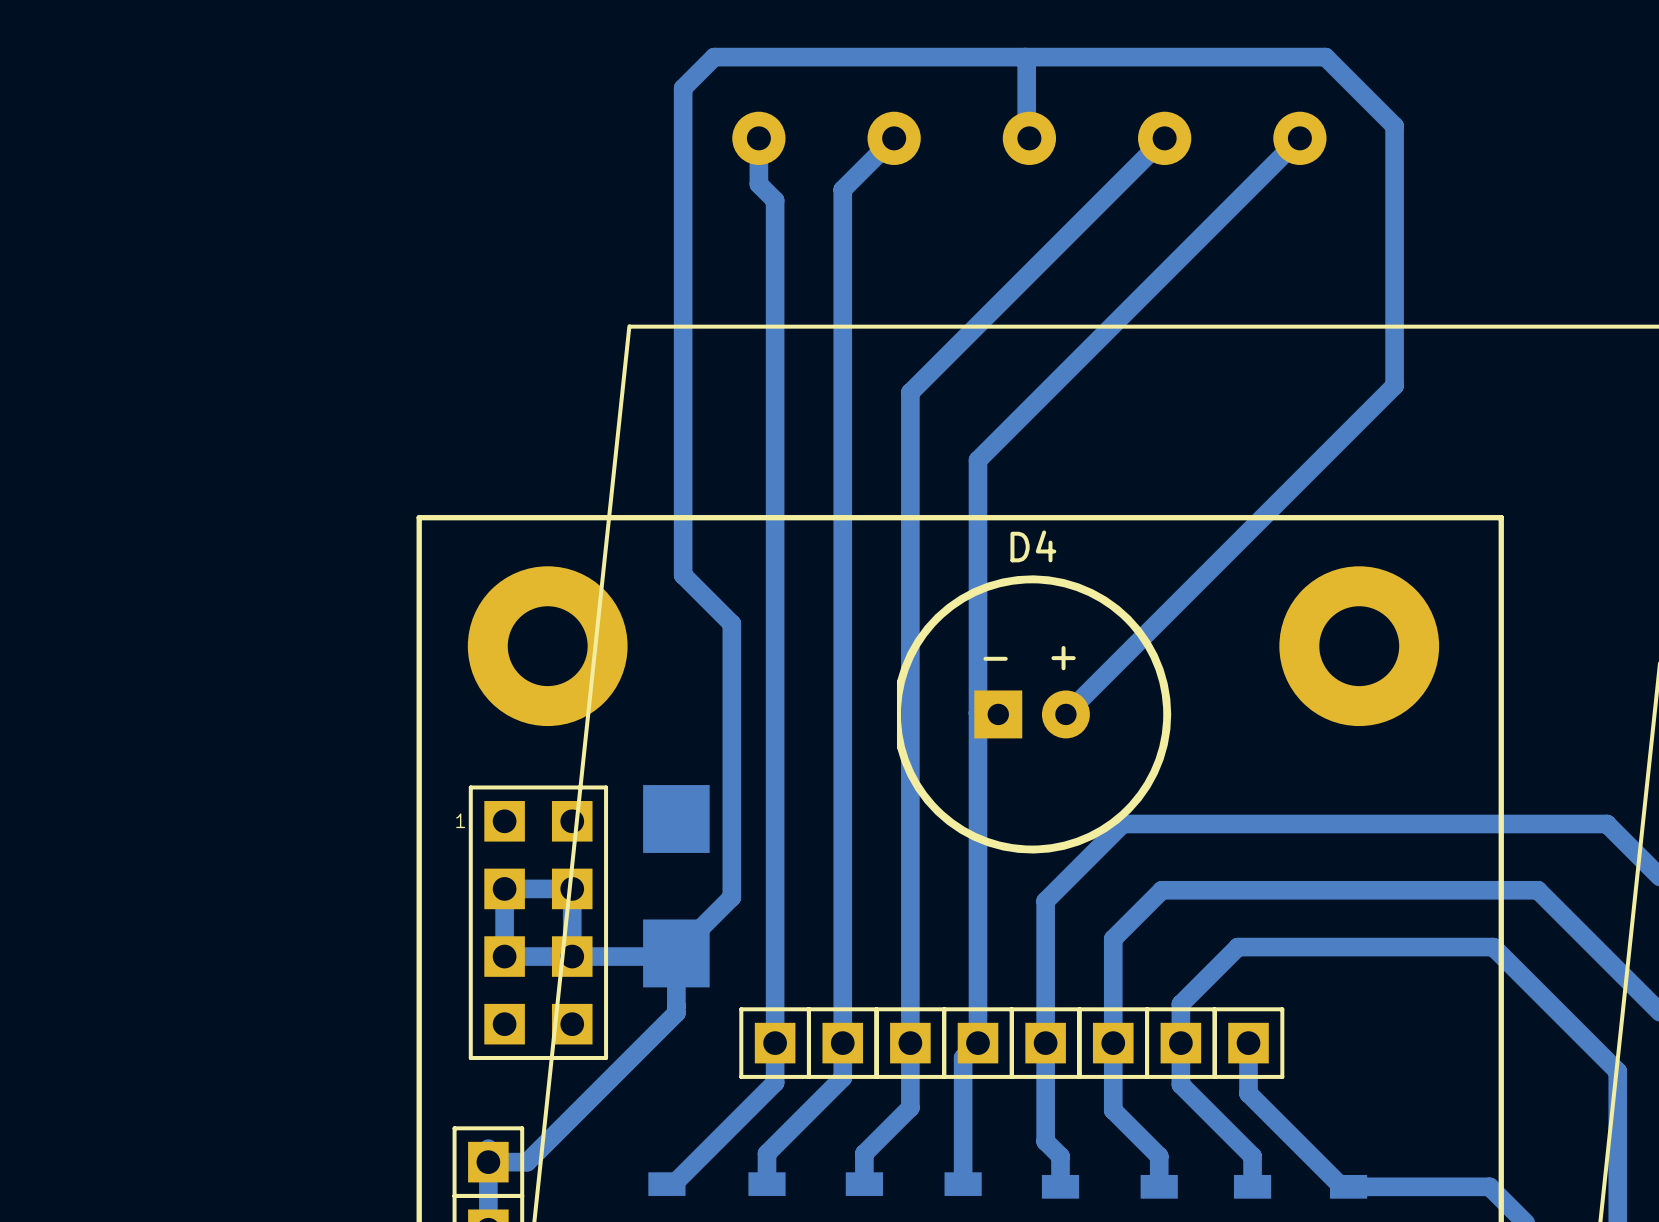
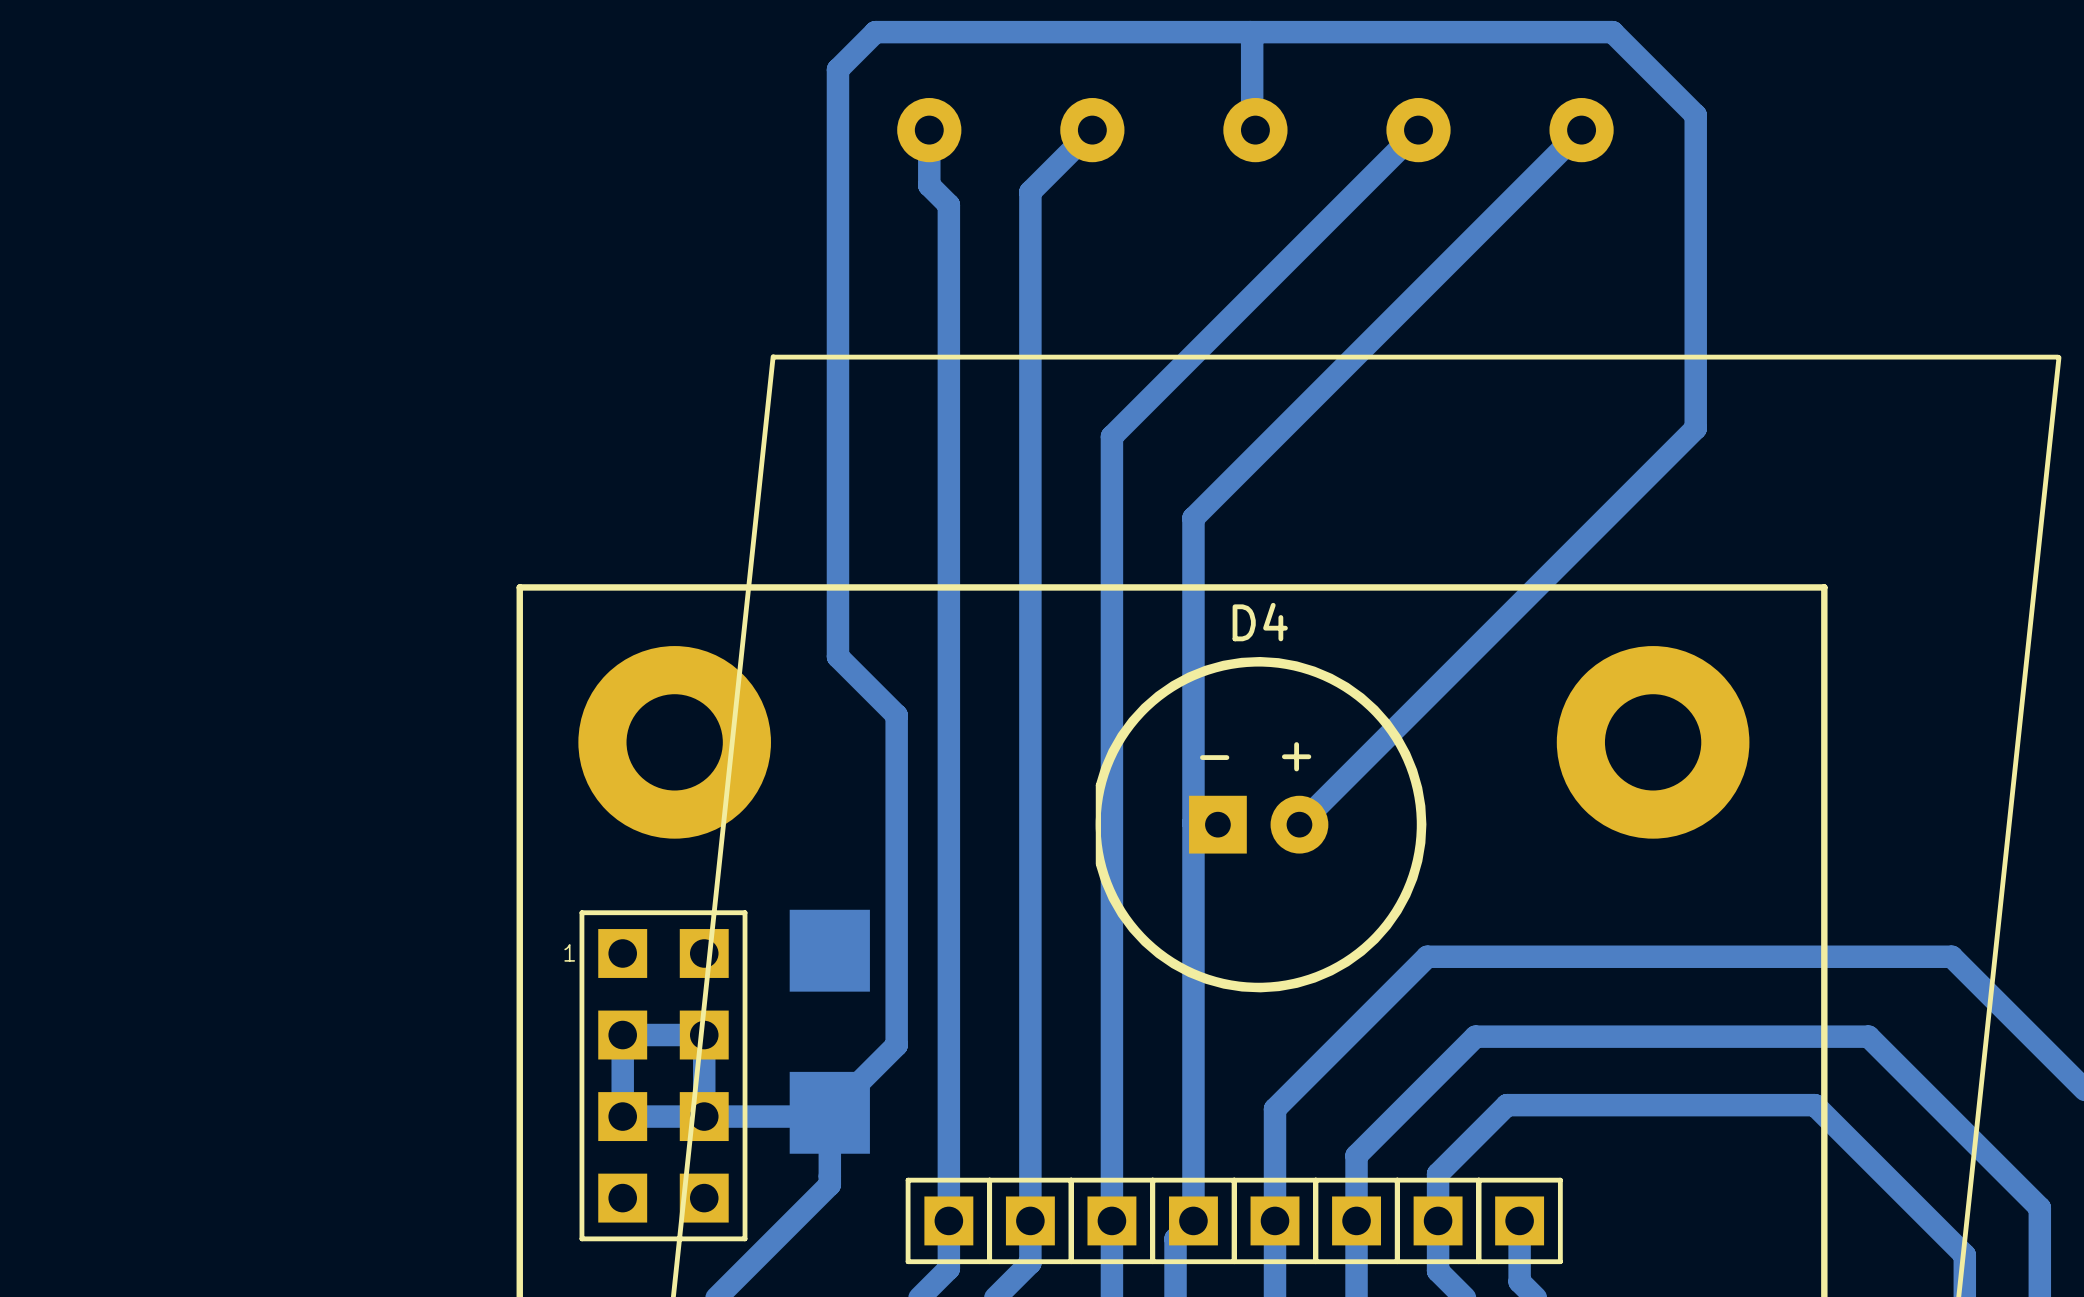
bottom track: (1171, 824) (1122, 824) (1045, 901) (1045, 950) -> (1427, 956) (1275, 1109)
bottom track: (1211, 890) (1161, 890) (1113, 938) (1113, 989) -> (1475, 1036) (1356, 1155)

